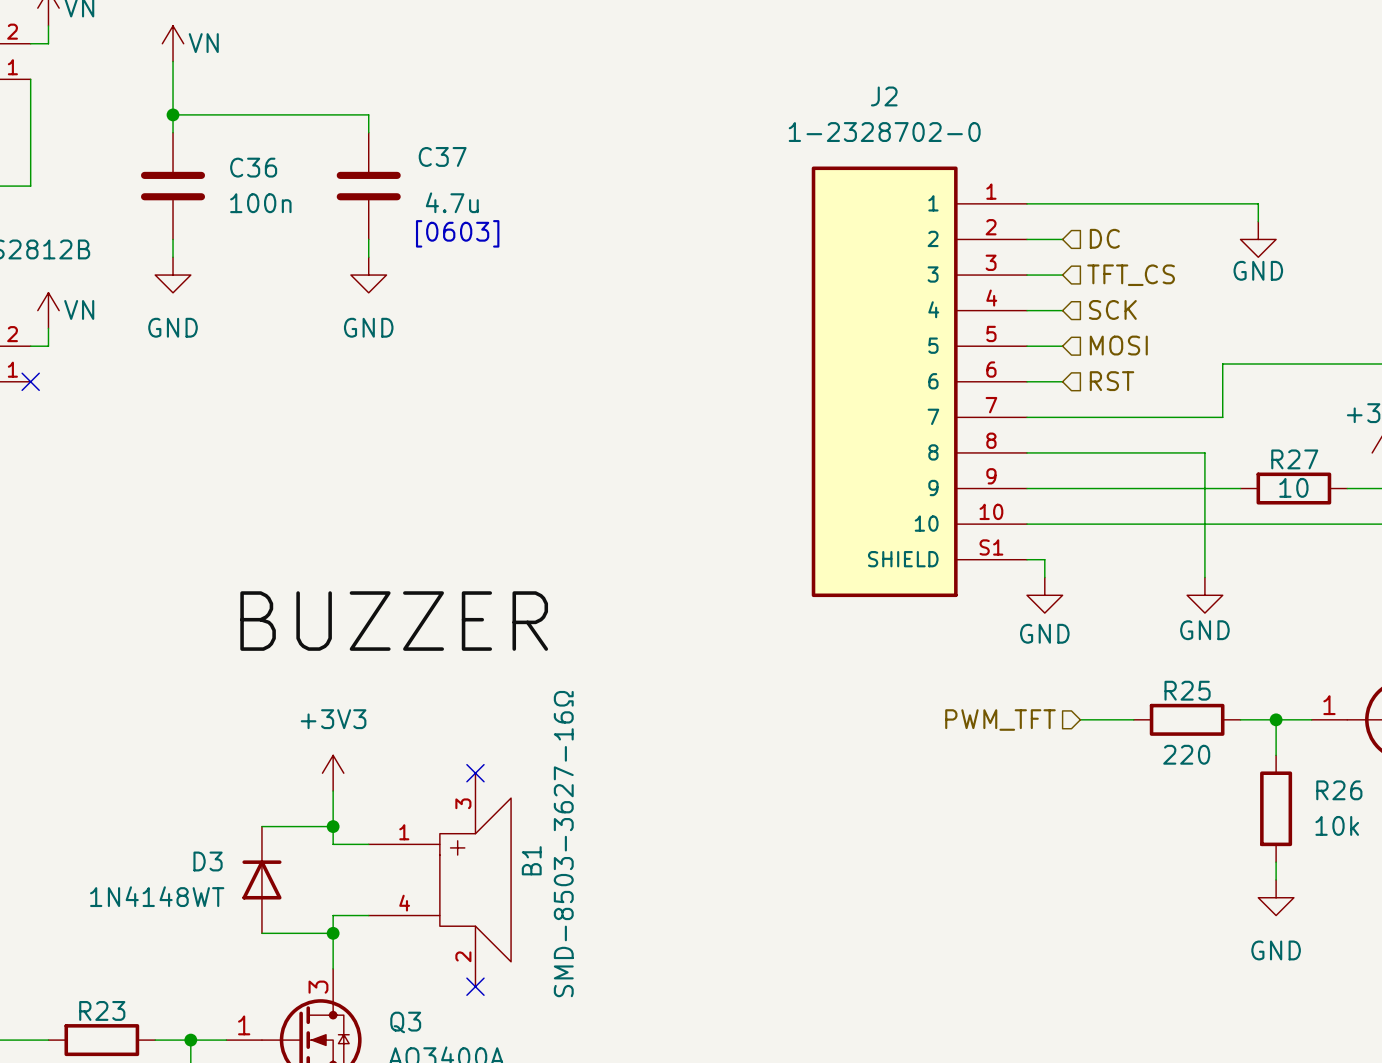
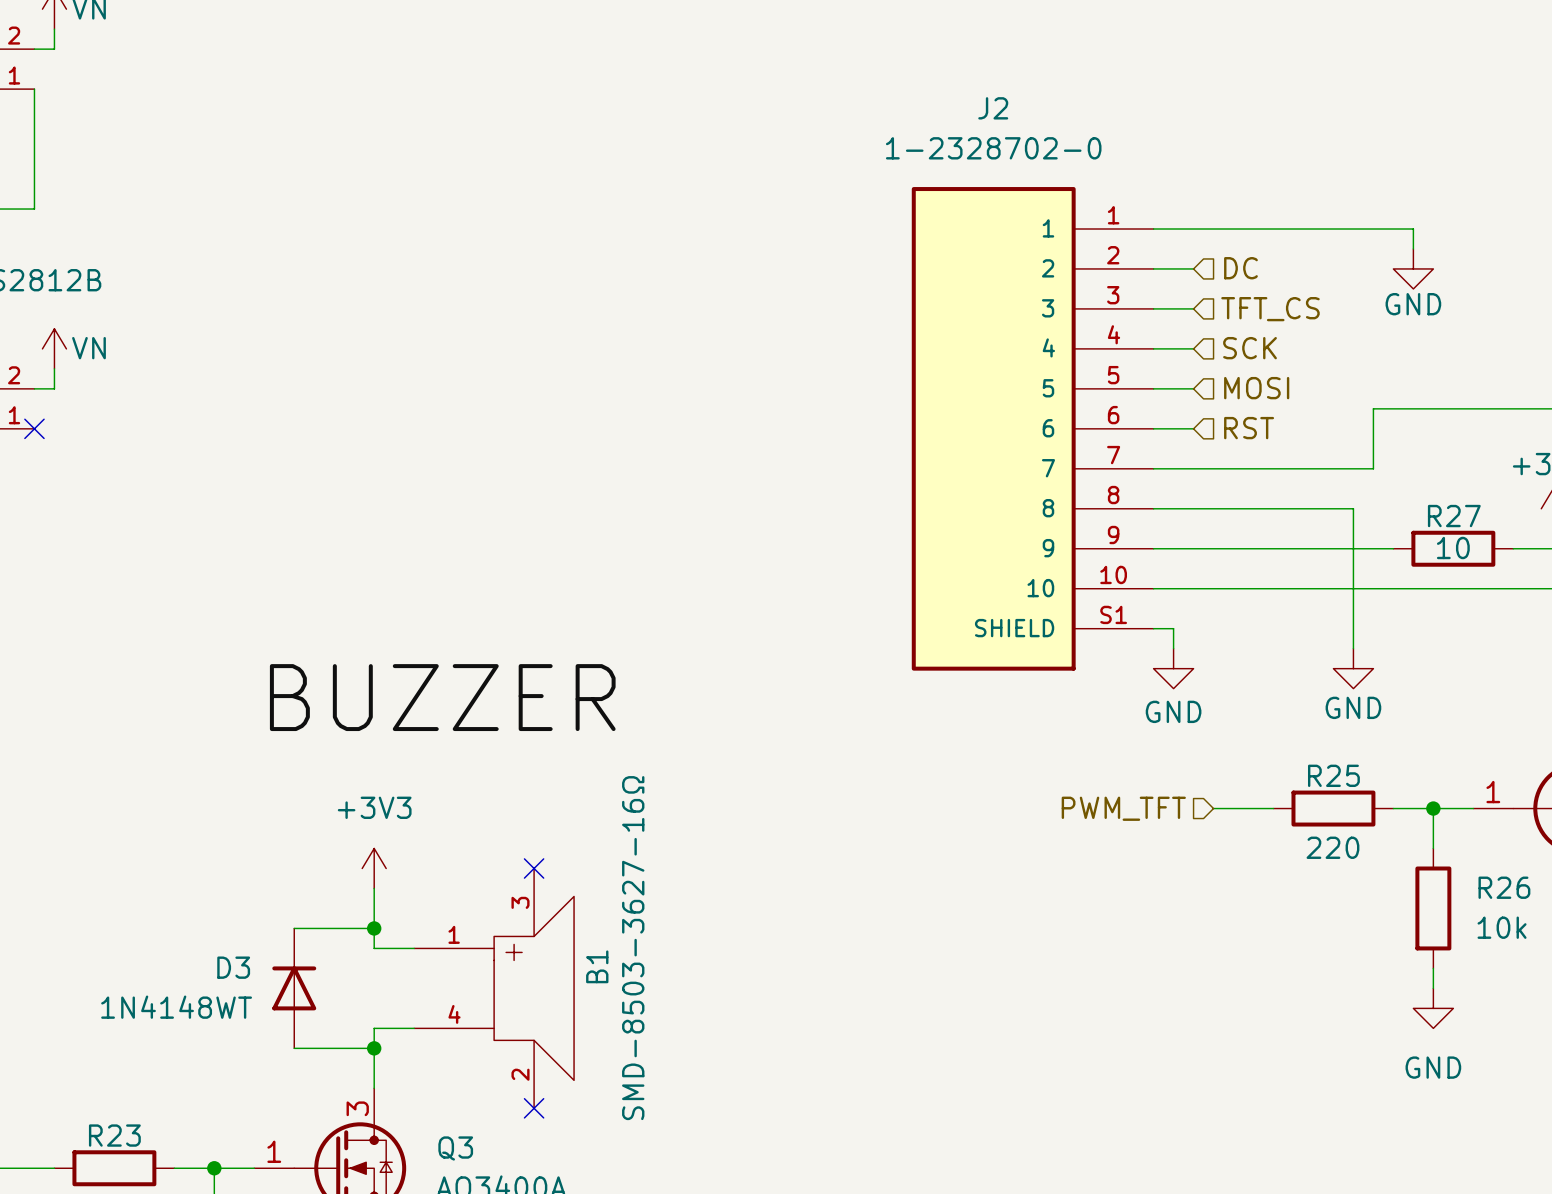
power symbol: VN (173, 43) -> none
wire: (173, 61) (173, 132) -> none
wire: (173, 114) (368, 114) (368, 132) -> none
junction: (173, 114) -> none
C36: 100n (173, 186) -> none
C37: 4.7u (368, 186) -> none
text: [0603] (457, 233) -> none
wire: (173, 239) (173, 257) -> none
wire: (368, 239) (368, 257) -> none
power symbol: GND (173, 275) -> none
power symbol: GND (368, 275) -> none

